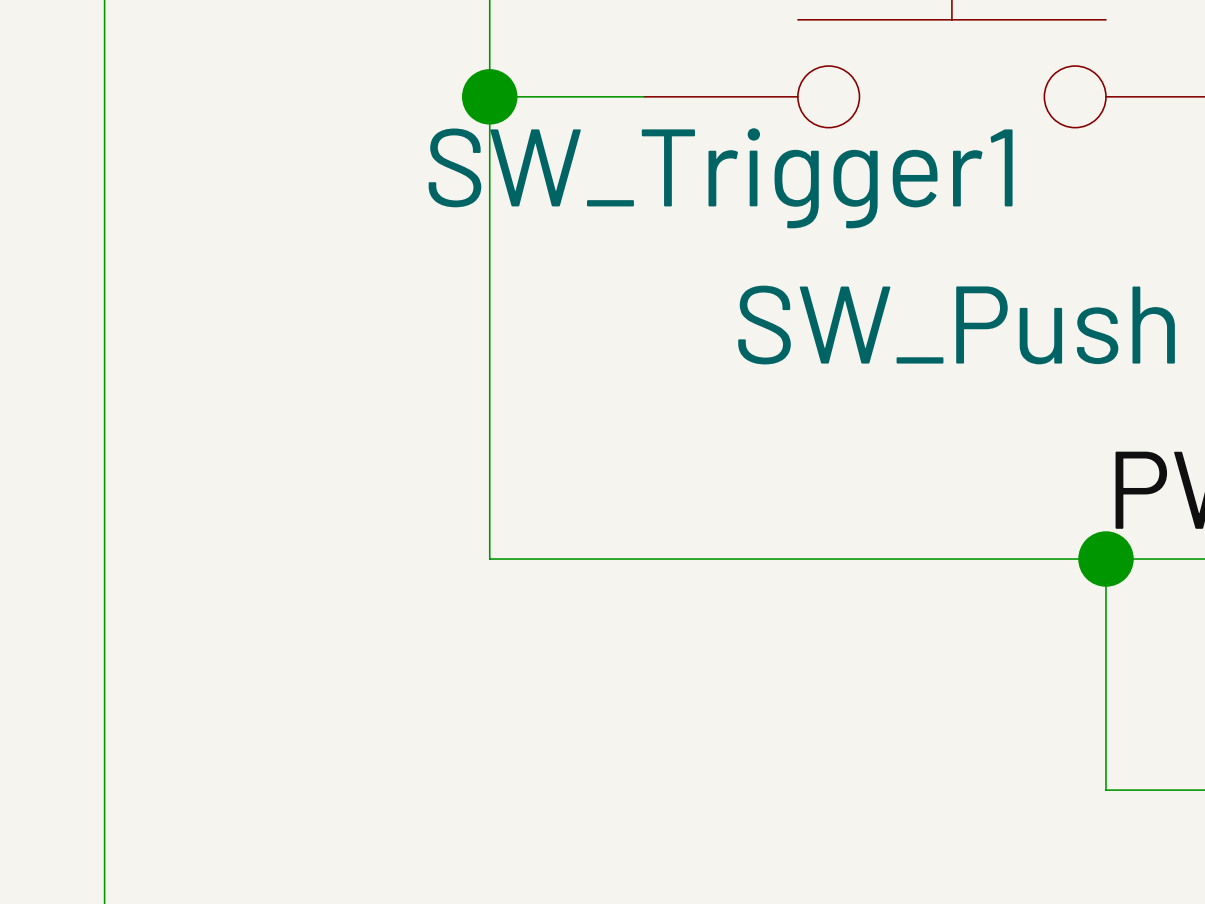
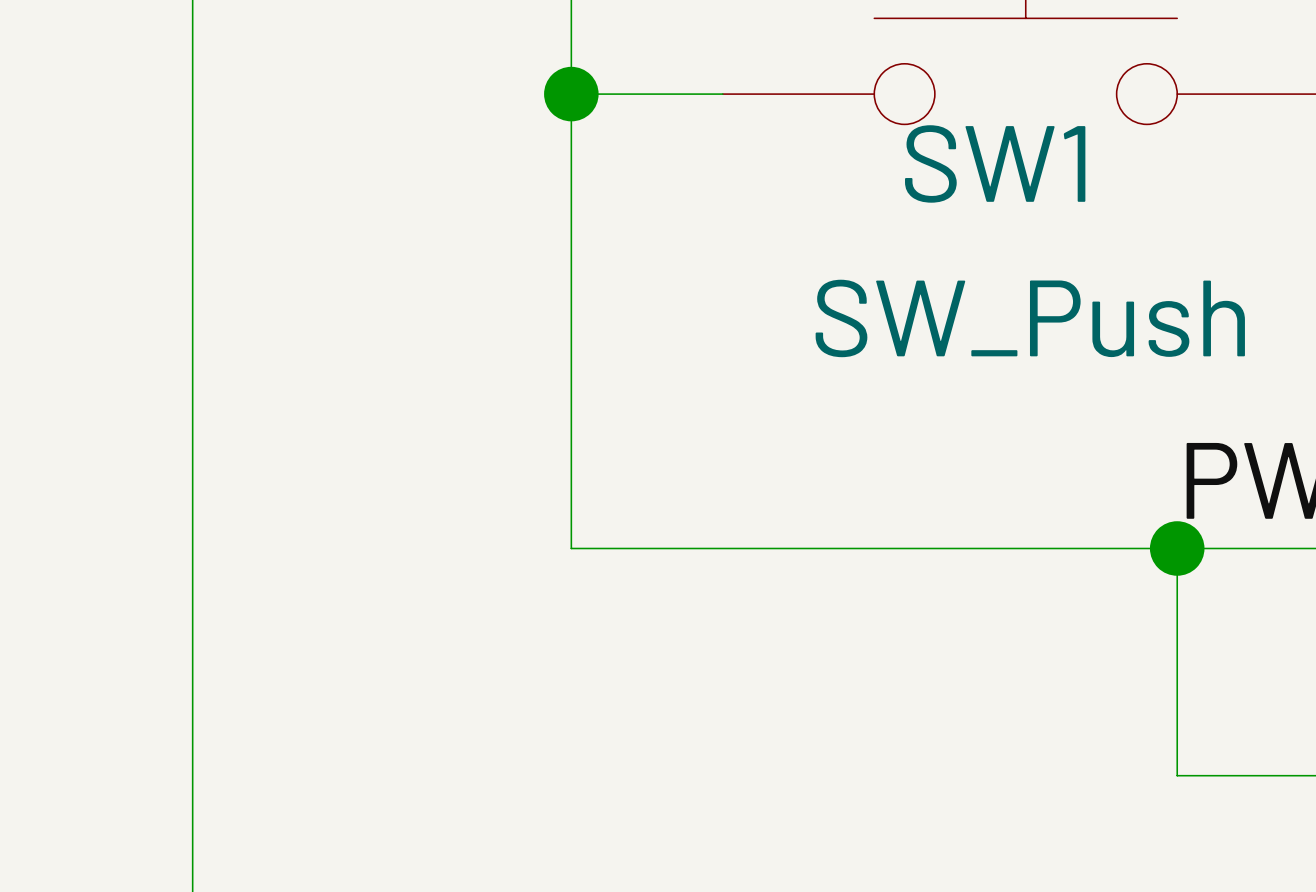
SW_Trigger1 name: SW_Trigger1 (720, 178) -> SW1 (995, 163)

